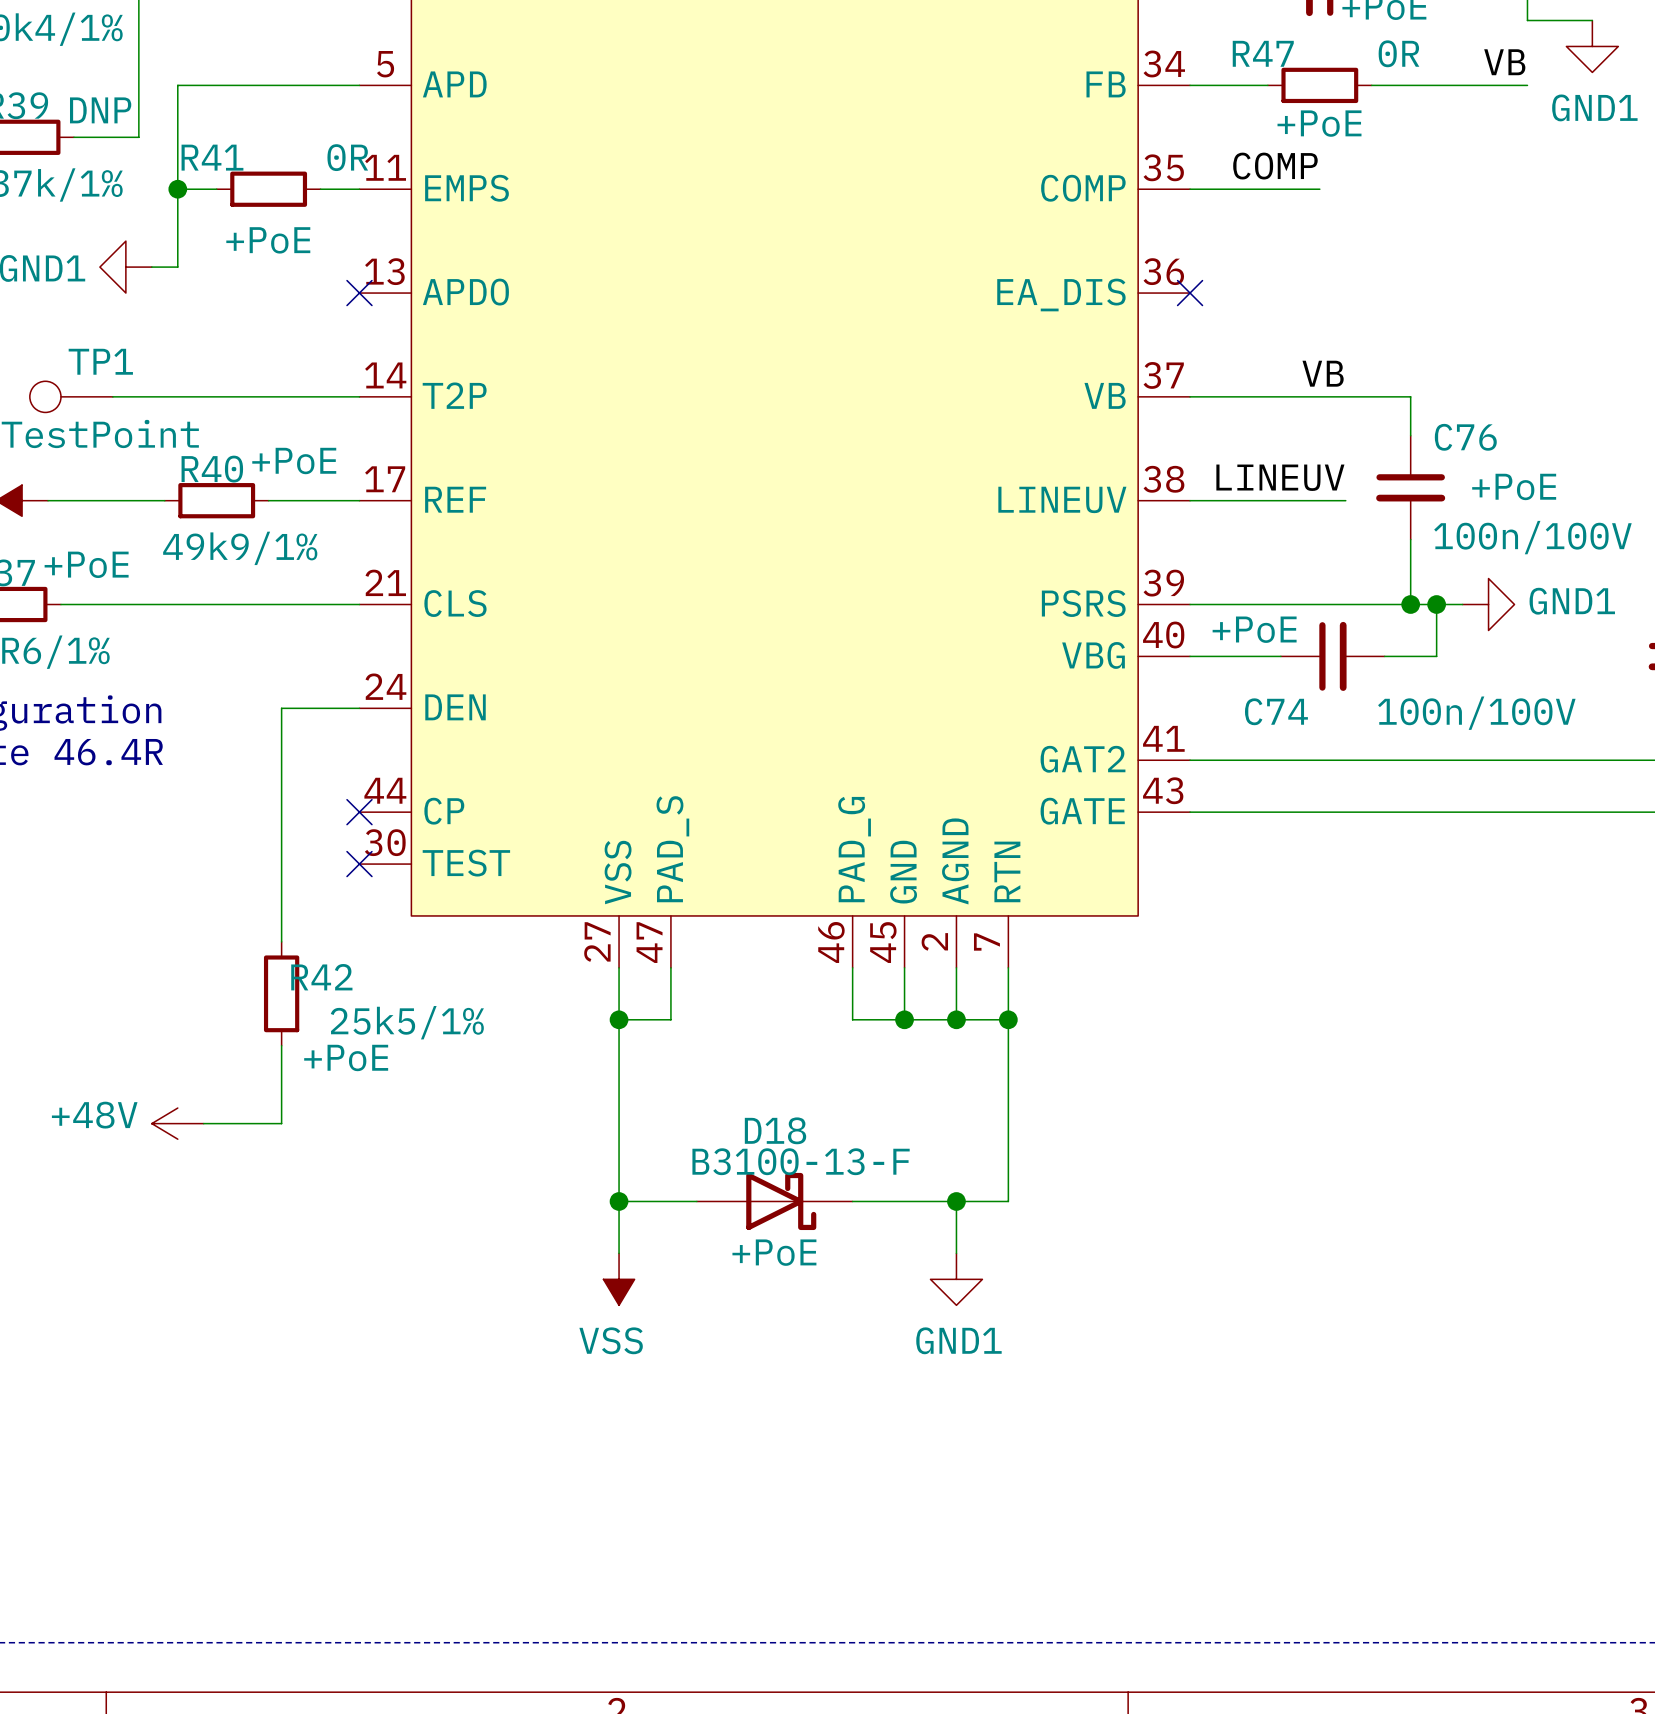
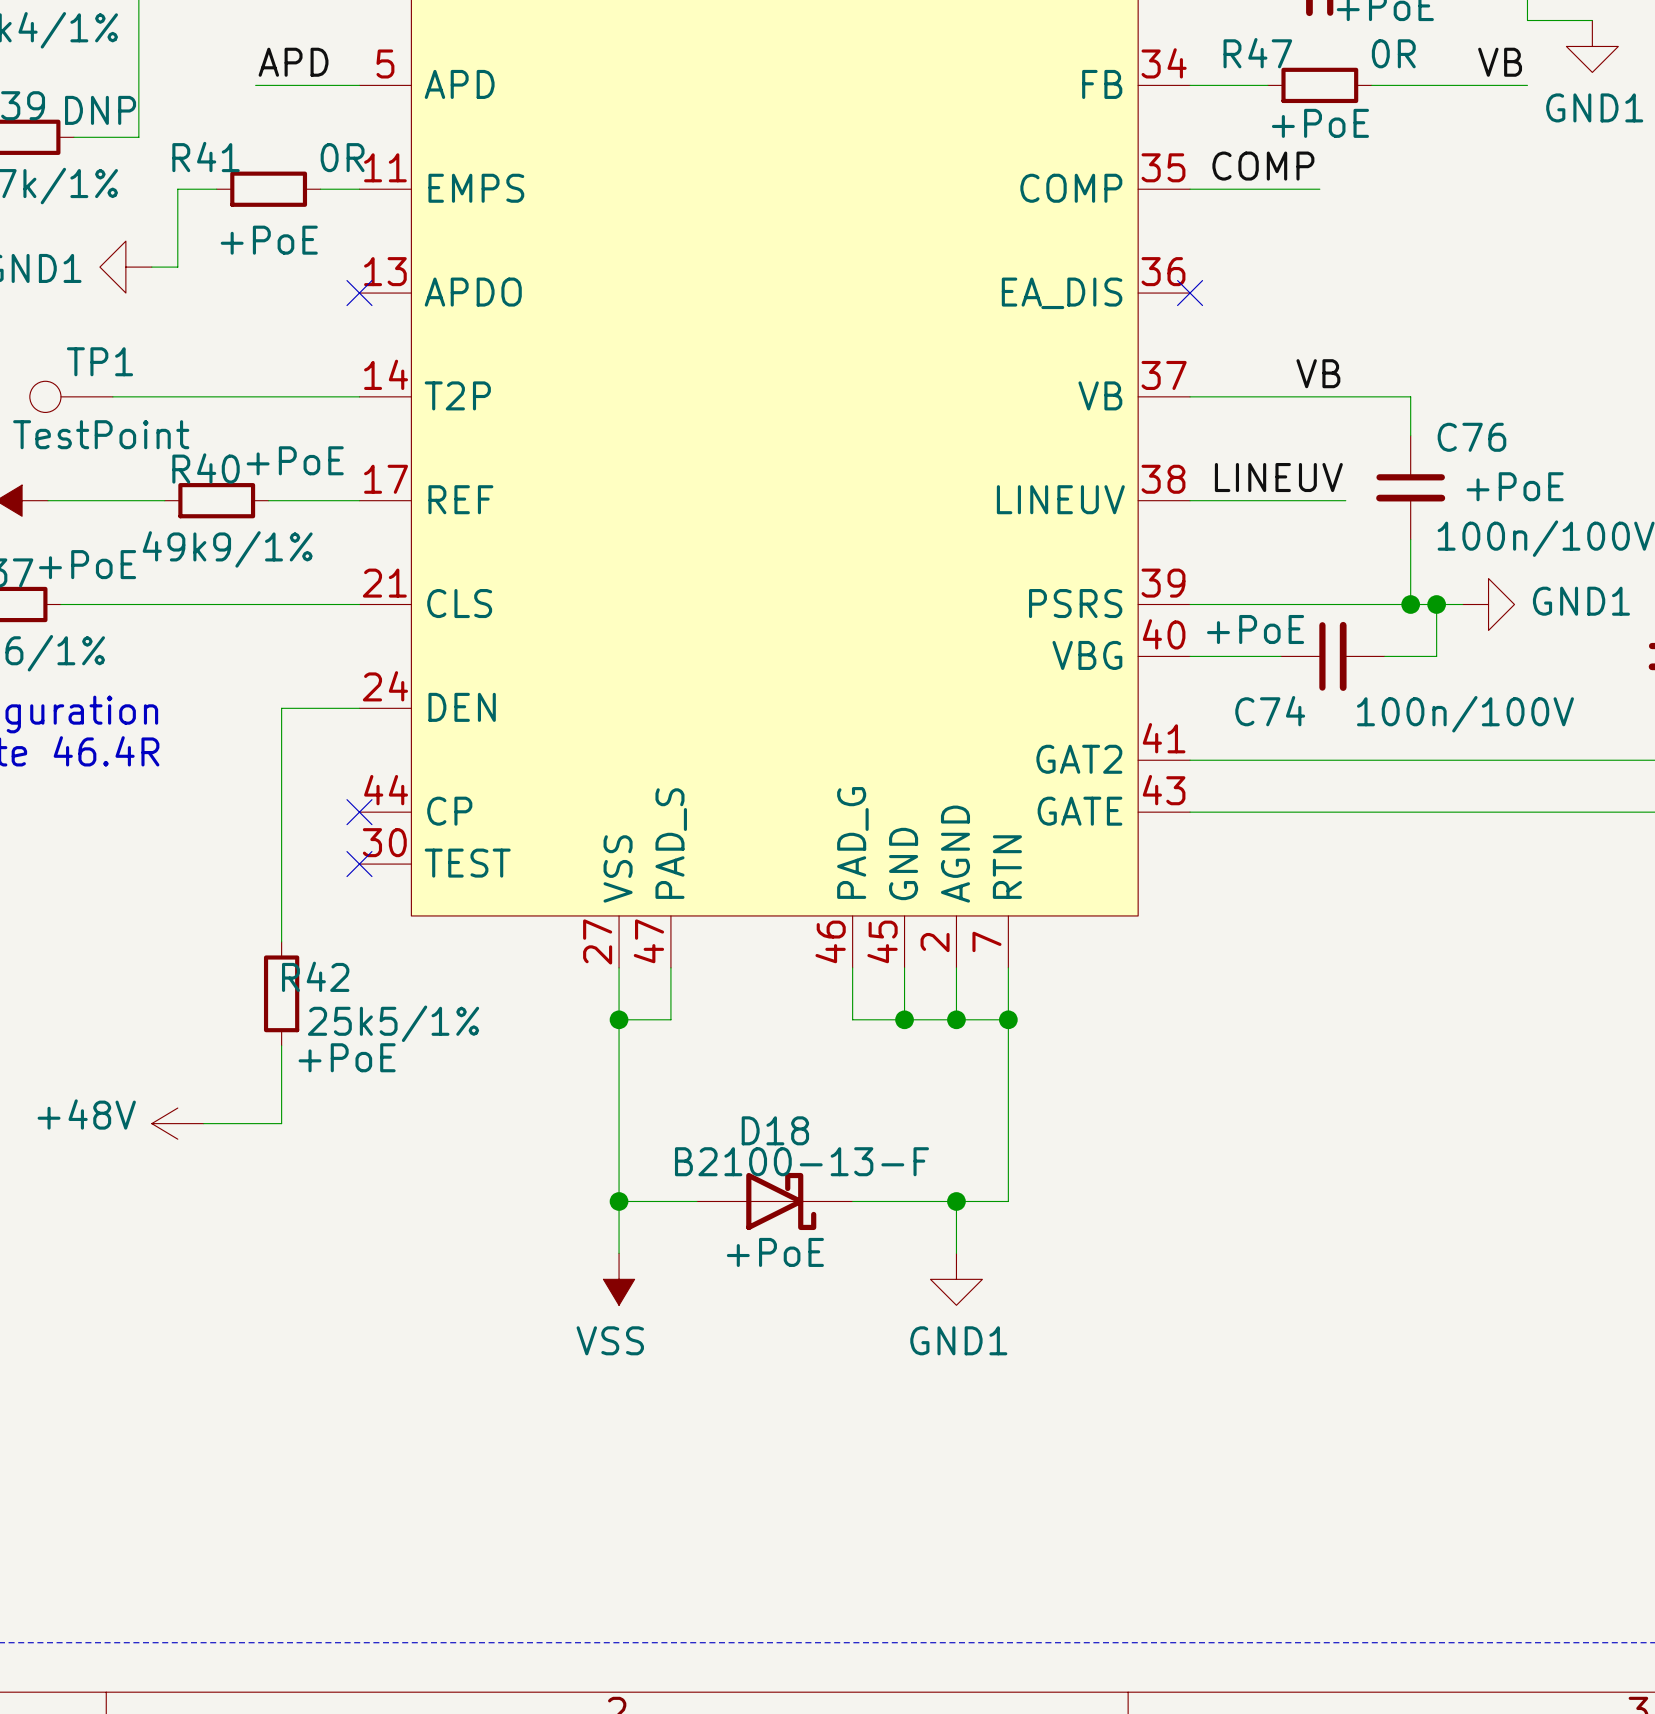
label: none -> APD (293, 62)
wire: (255, 85) (177, 85) (177, 189) -> none
junction: (177, 189) -> none
D18 value: B3100-13-F (801, 1161) -> B2100-13-F (801, 1161)

